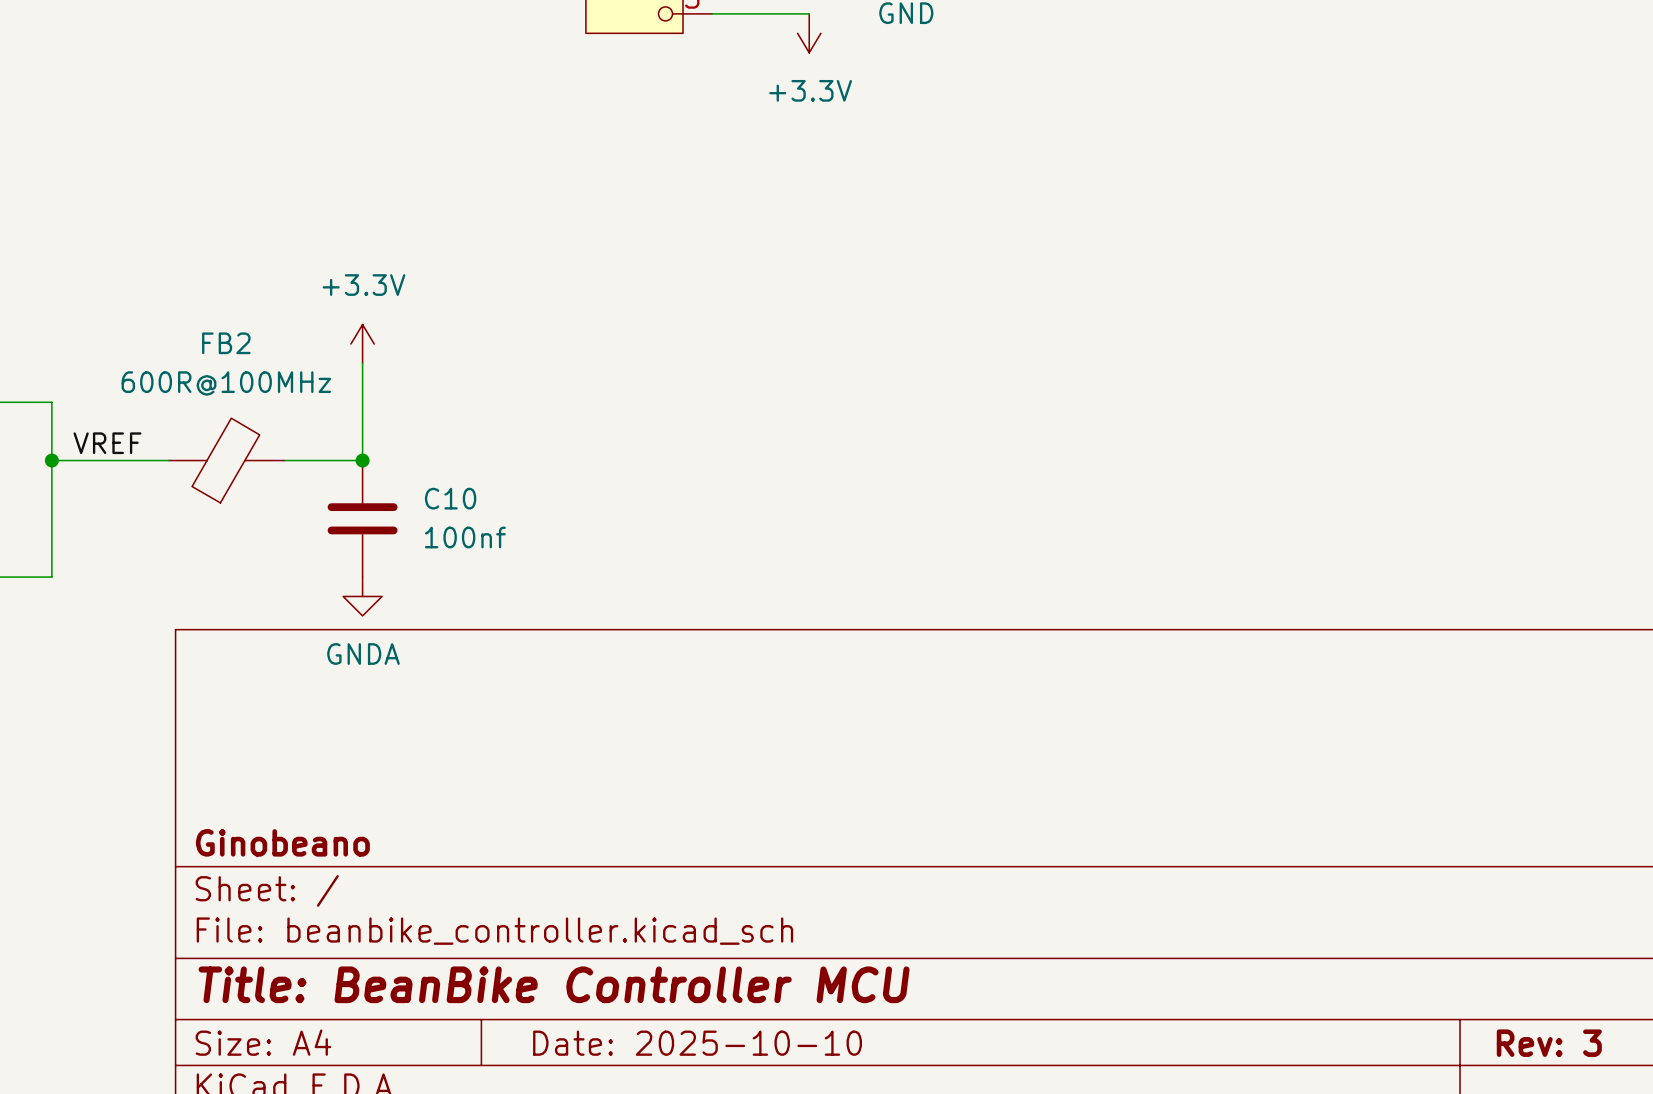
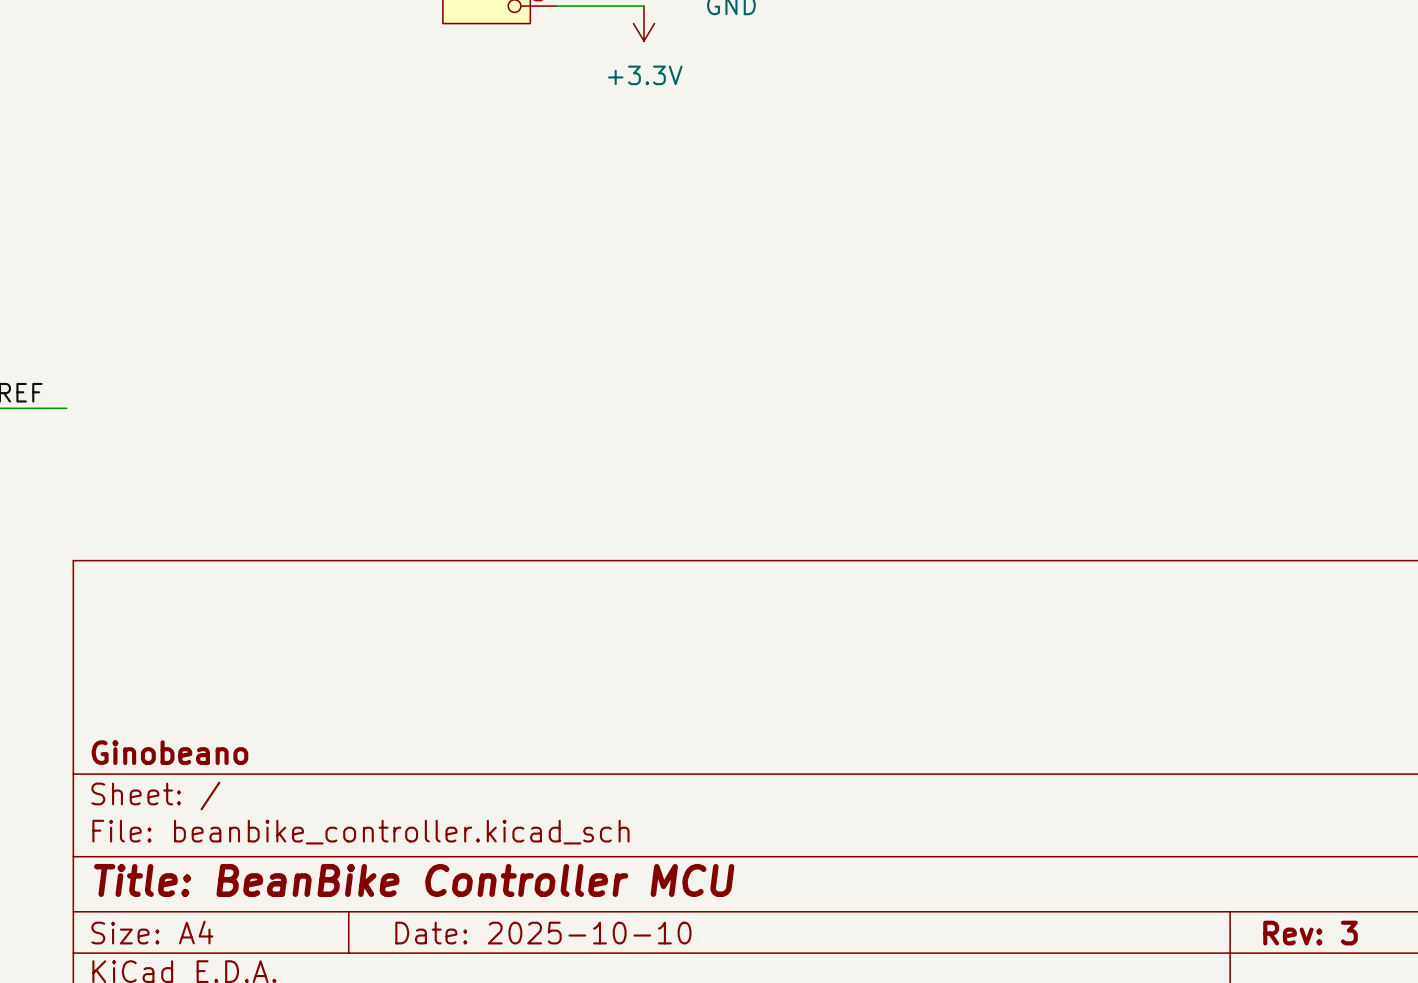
power symbol: +3.3V (362, 344) -> none
wire: (362, 363) (362, 460) (284, 460) -> none
FB2: 600R@100MHz (226, 460) -> none
junction: (362, 460) -> none
C10: 100nf (362, 518) -> none
power symbol: GNDA (362, 596) -> none

